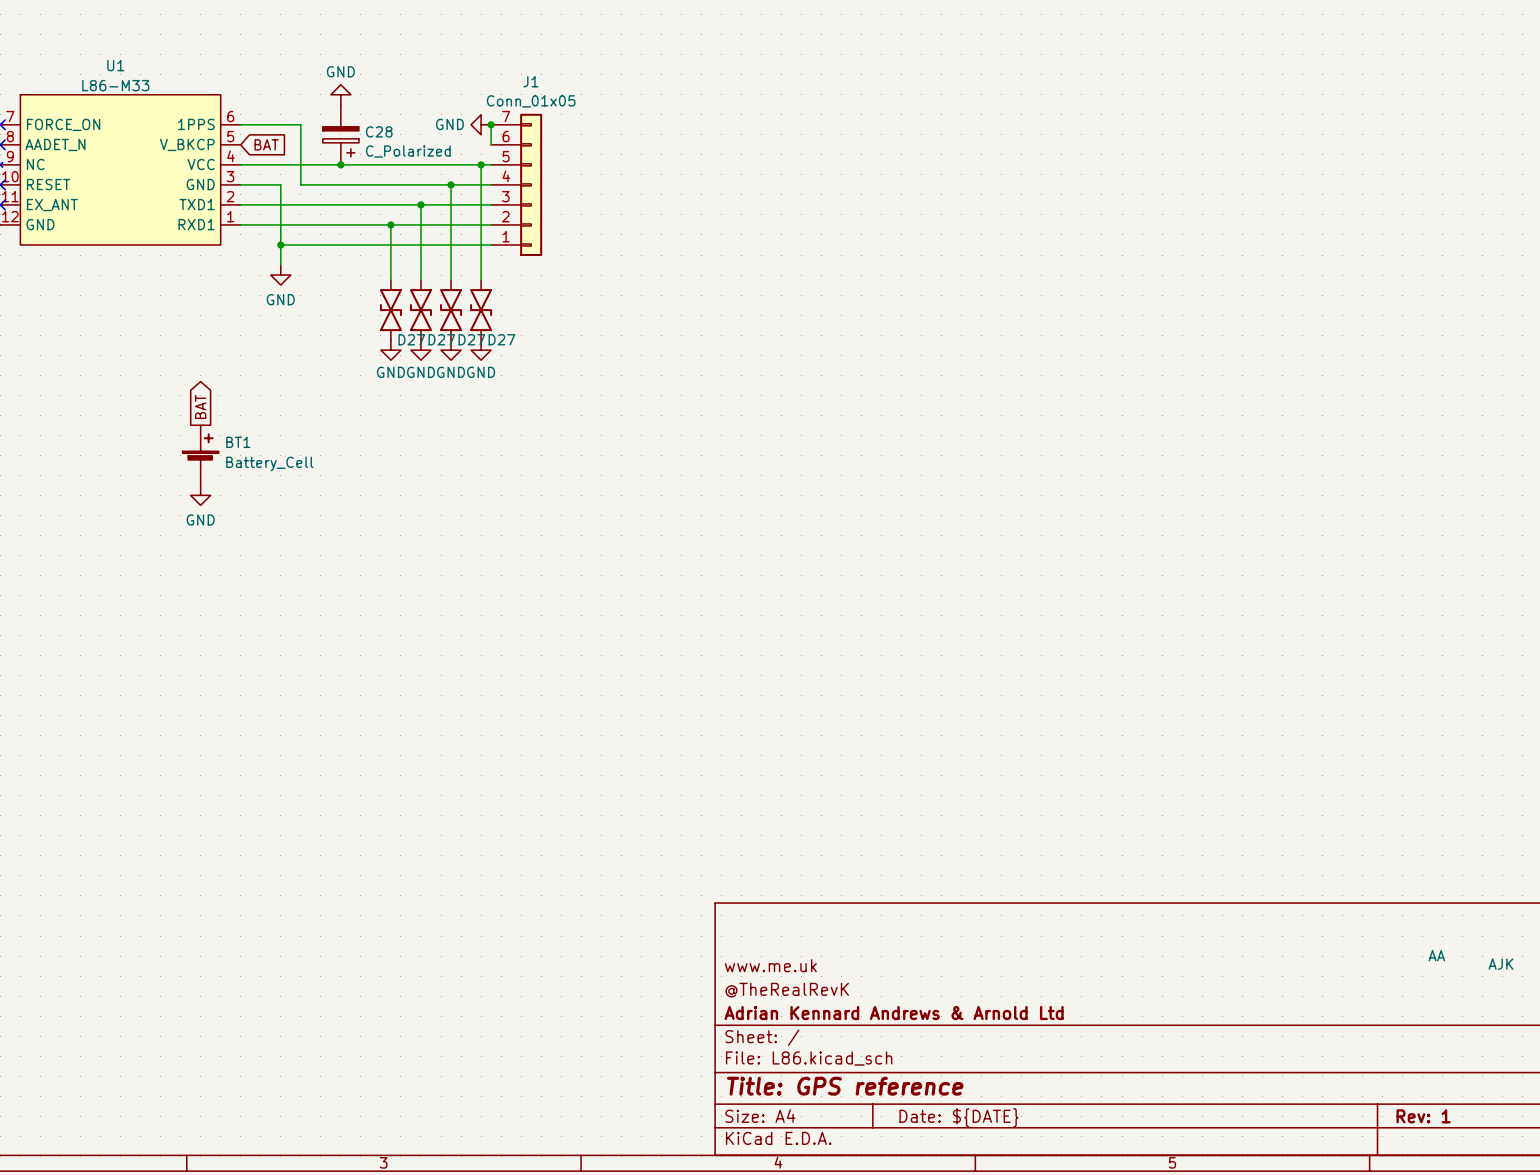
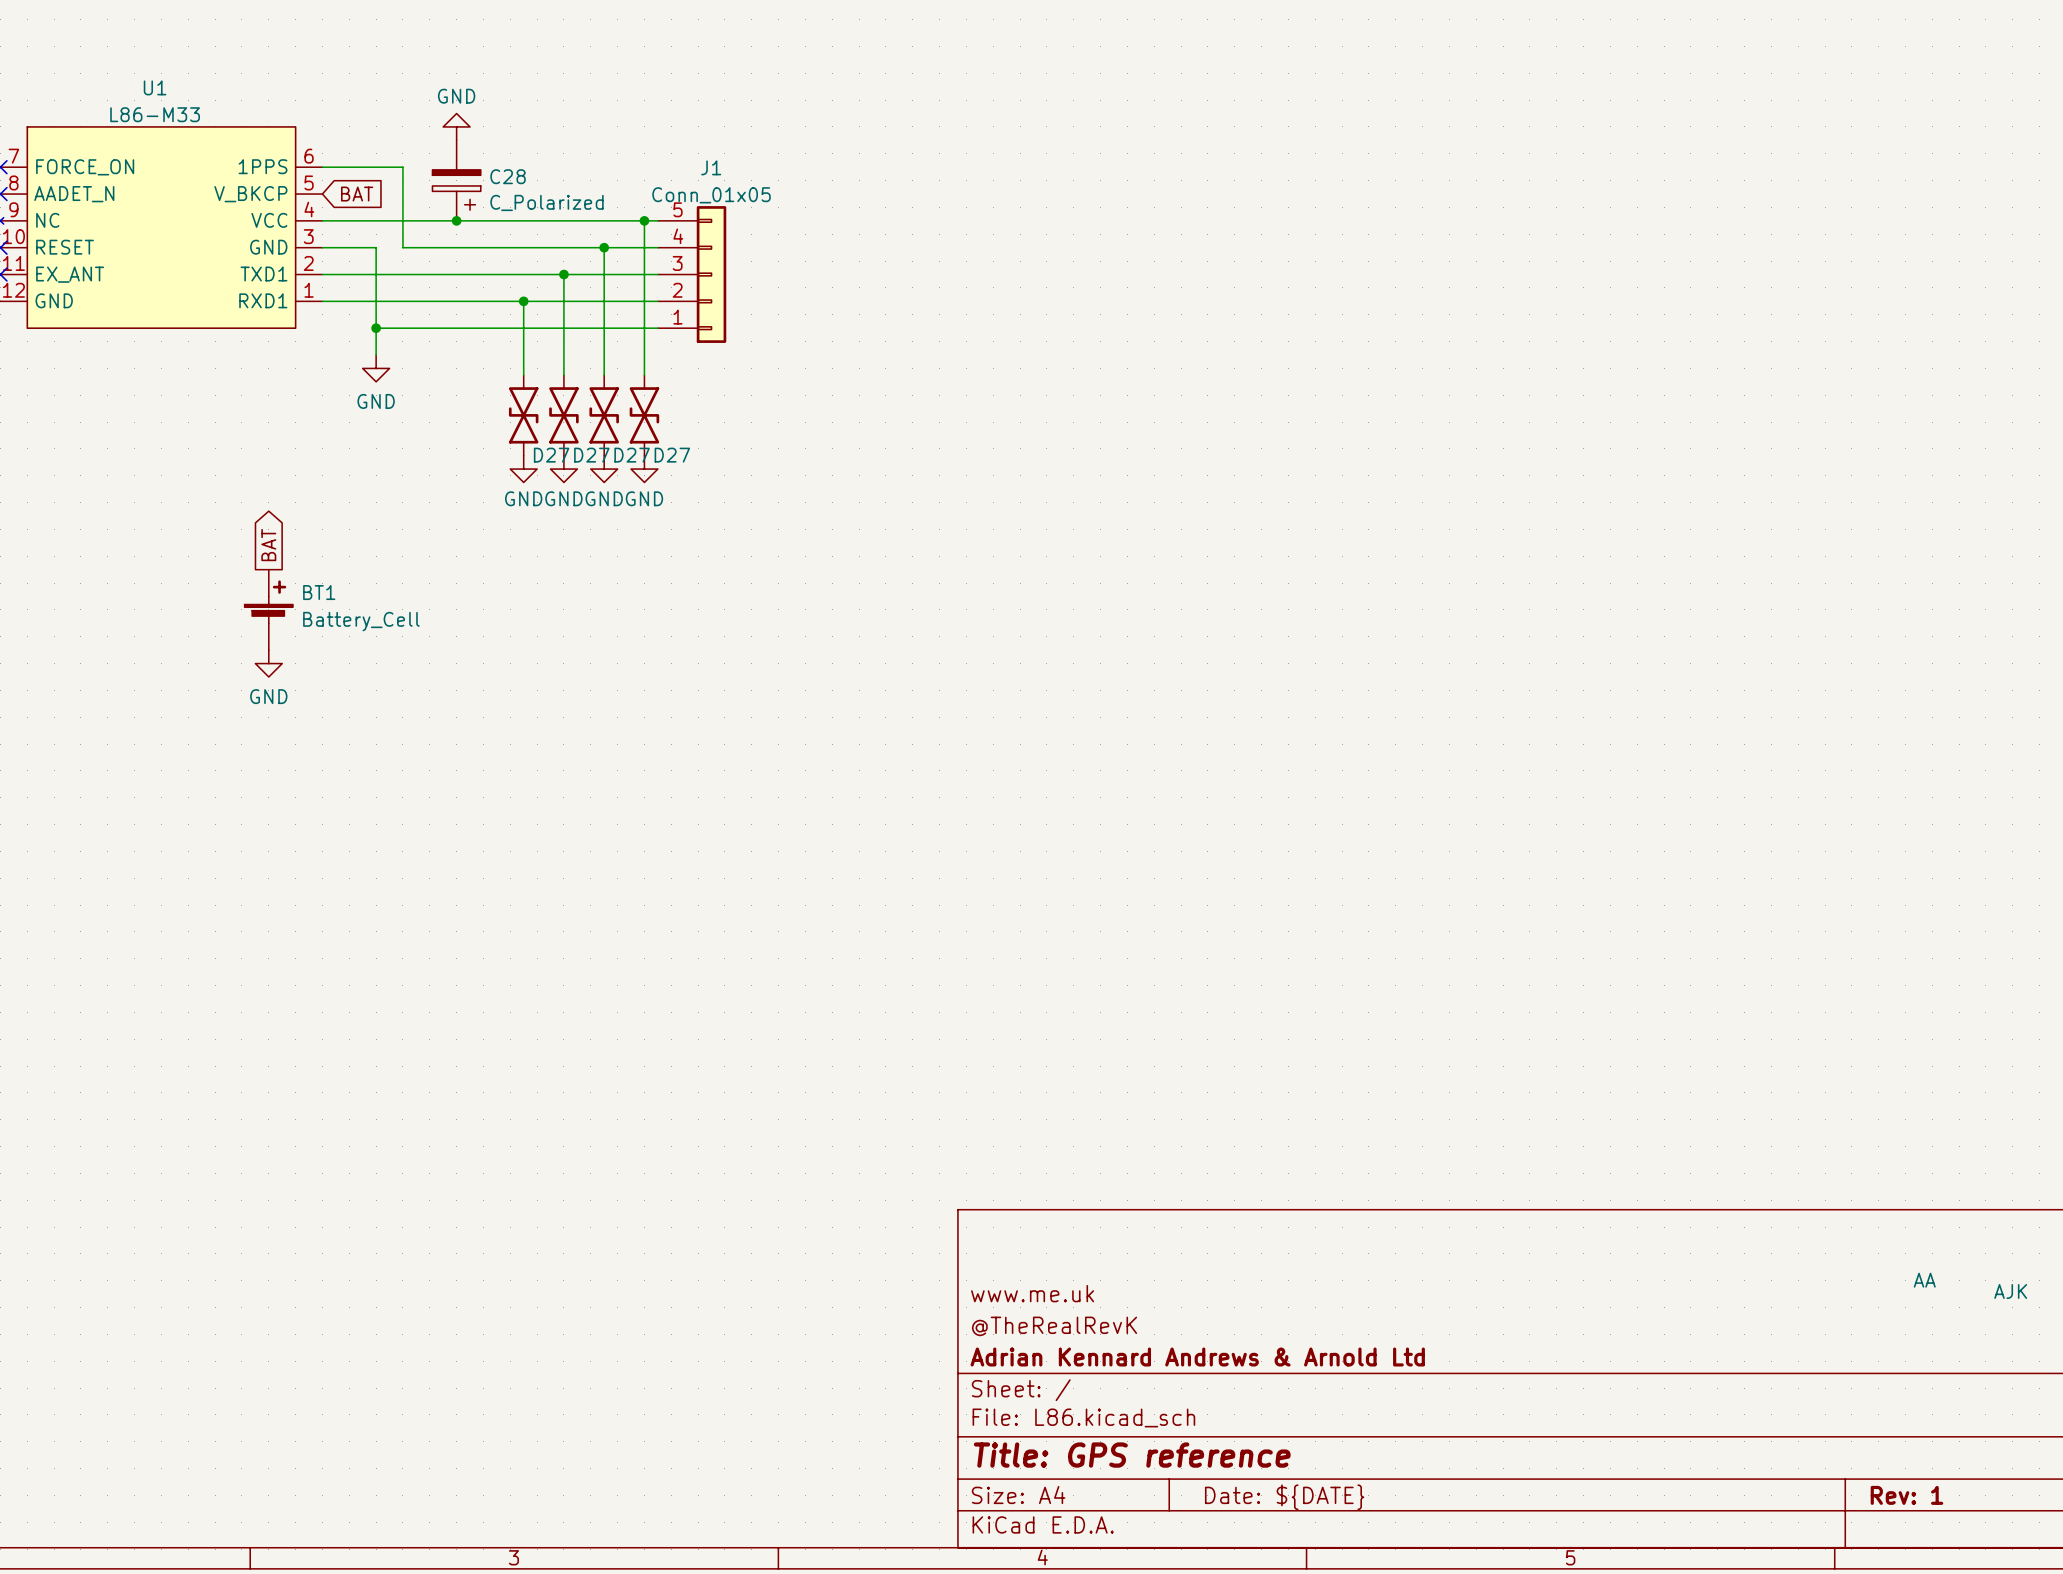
J1 name position: J1 (530, 81) -> J1 (711, 167)
J1 value position: Conn_01x05 (531, 101) -> Conn_01x05 (711, 195)
J1 symbol: [491, 113, 543, 257] -> [657, 206, 727, 343]
power symbol: GND (481, 124) -> none
wire: (491, 124) (491, 144) -> none
junction: (491, 124) -> none

